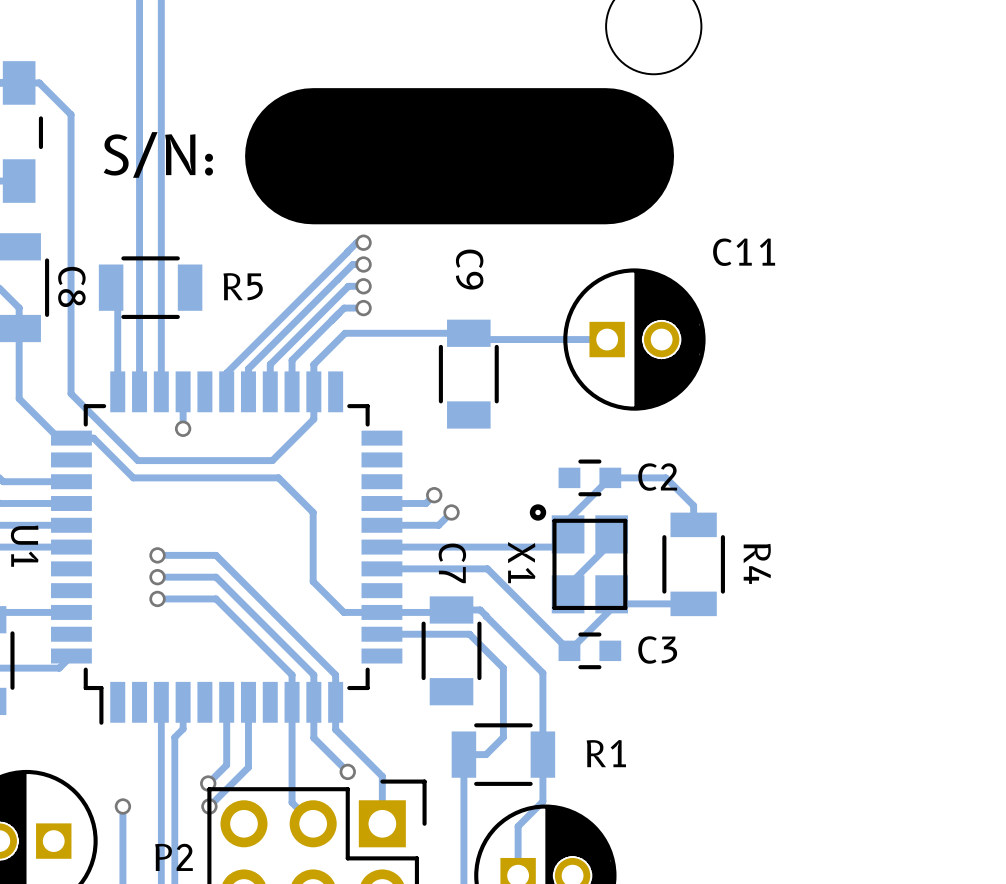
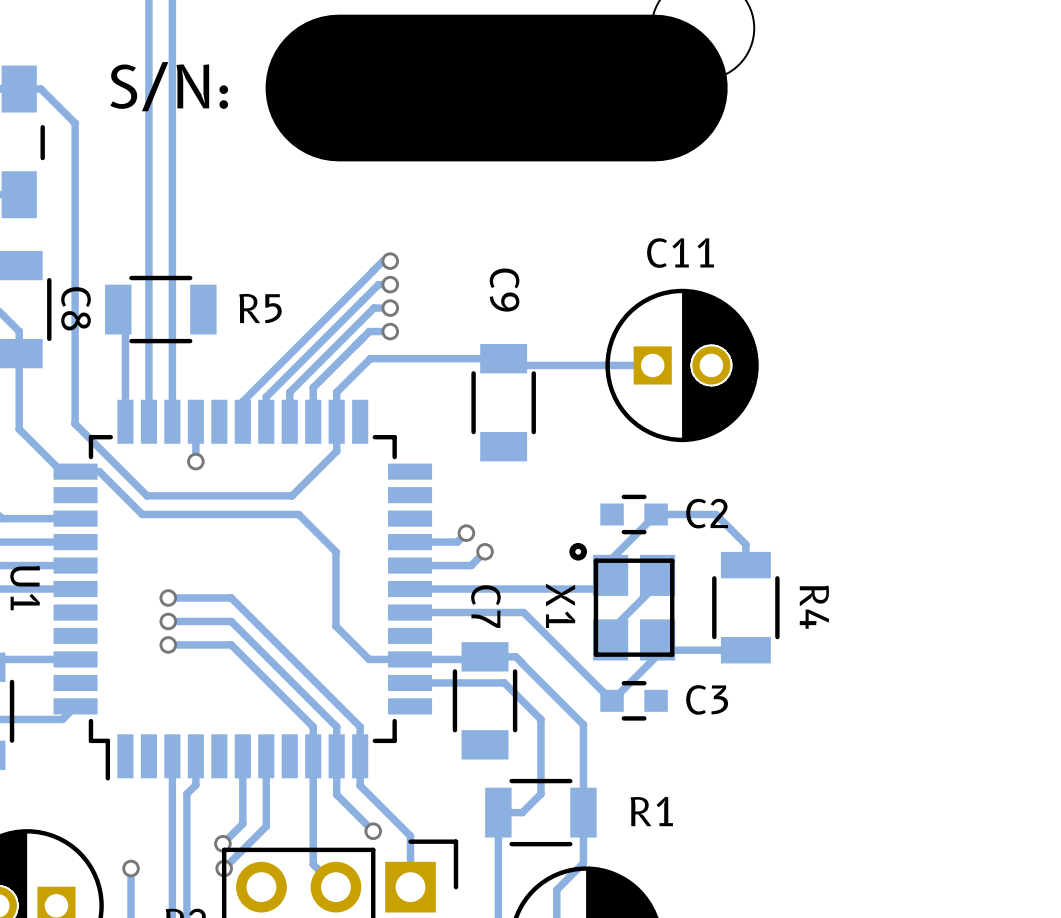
text position: S/N: (158, 154) -> S/N: (169, 86)
line: (605, 156) (313, 156) -> (654, 88) (338, 88)
C11 name position: C11 (744, 252) -> C11 (680, 253)

